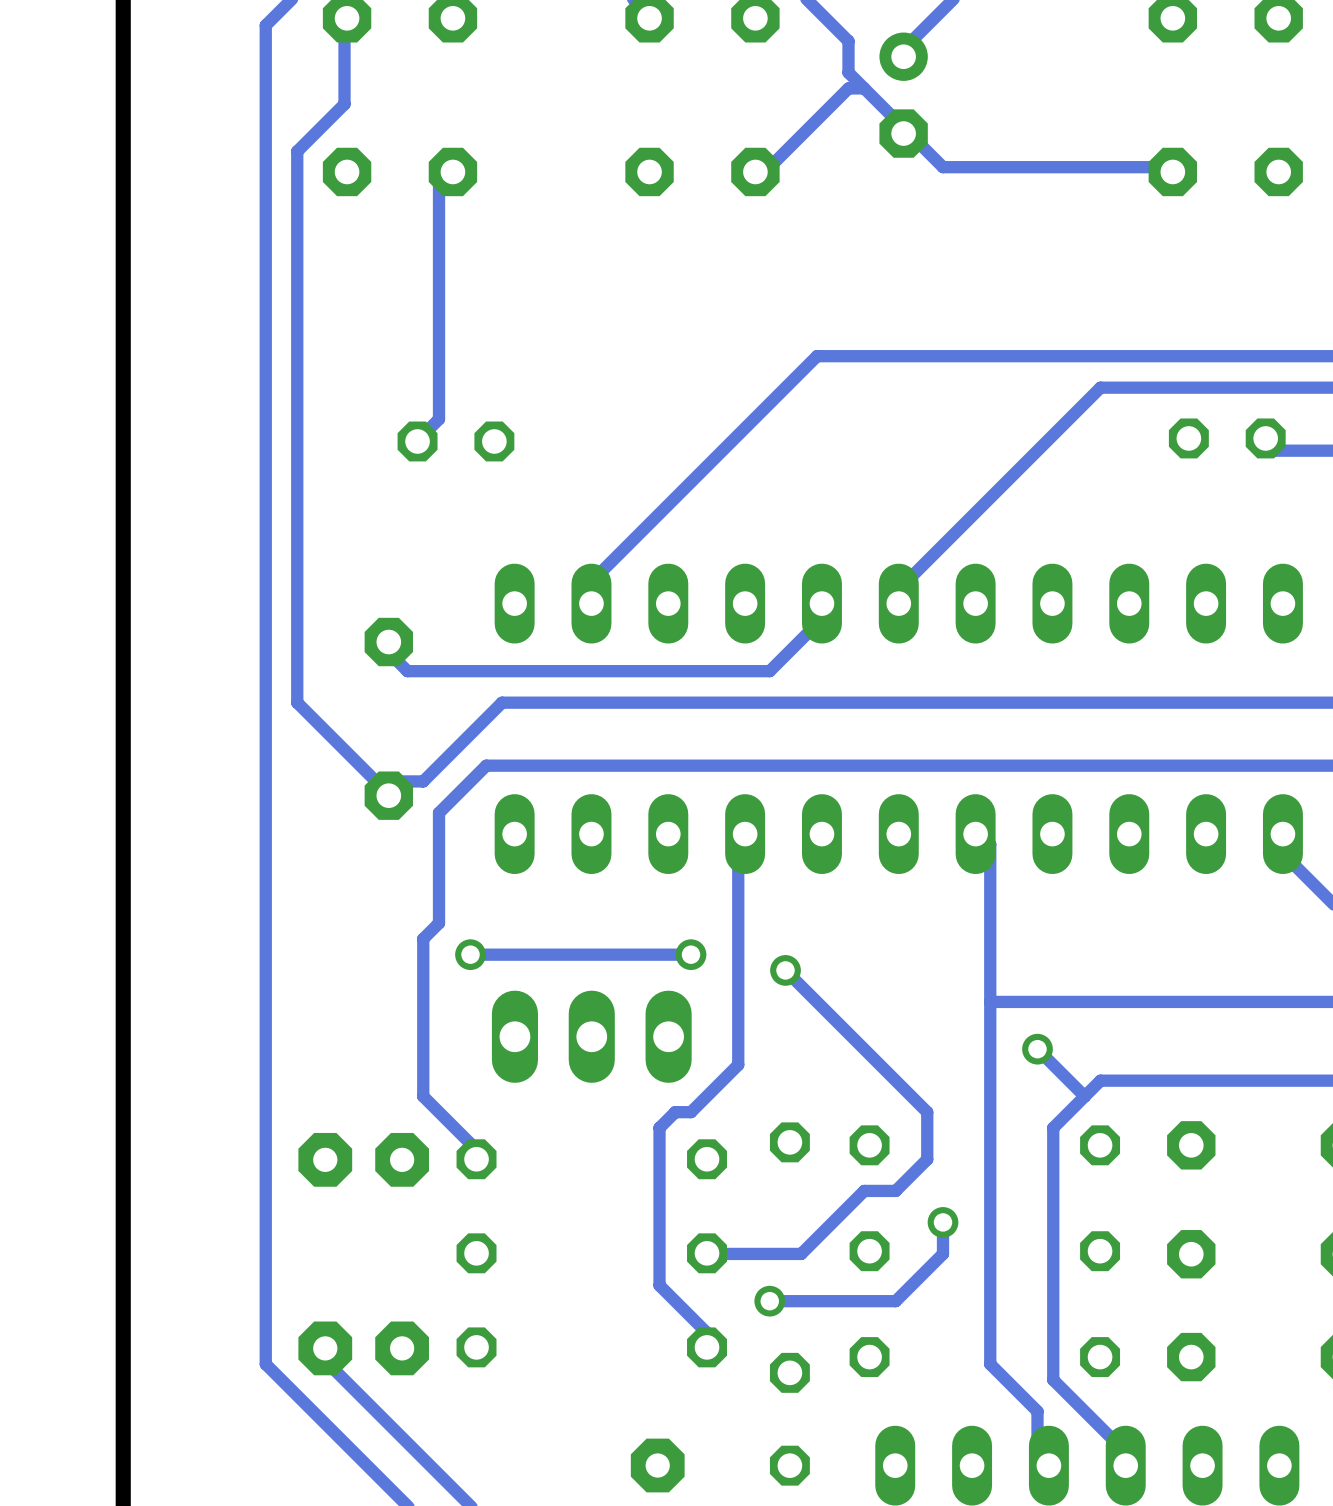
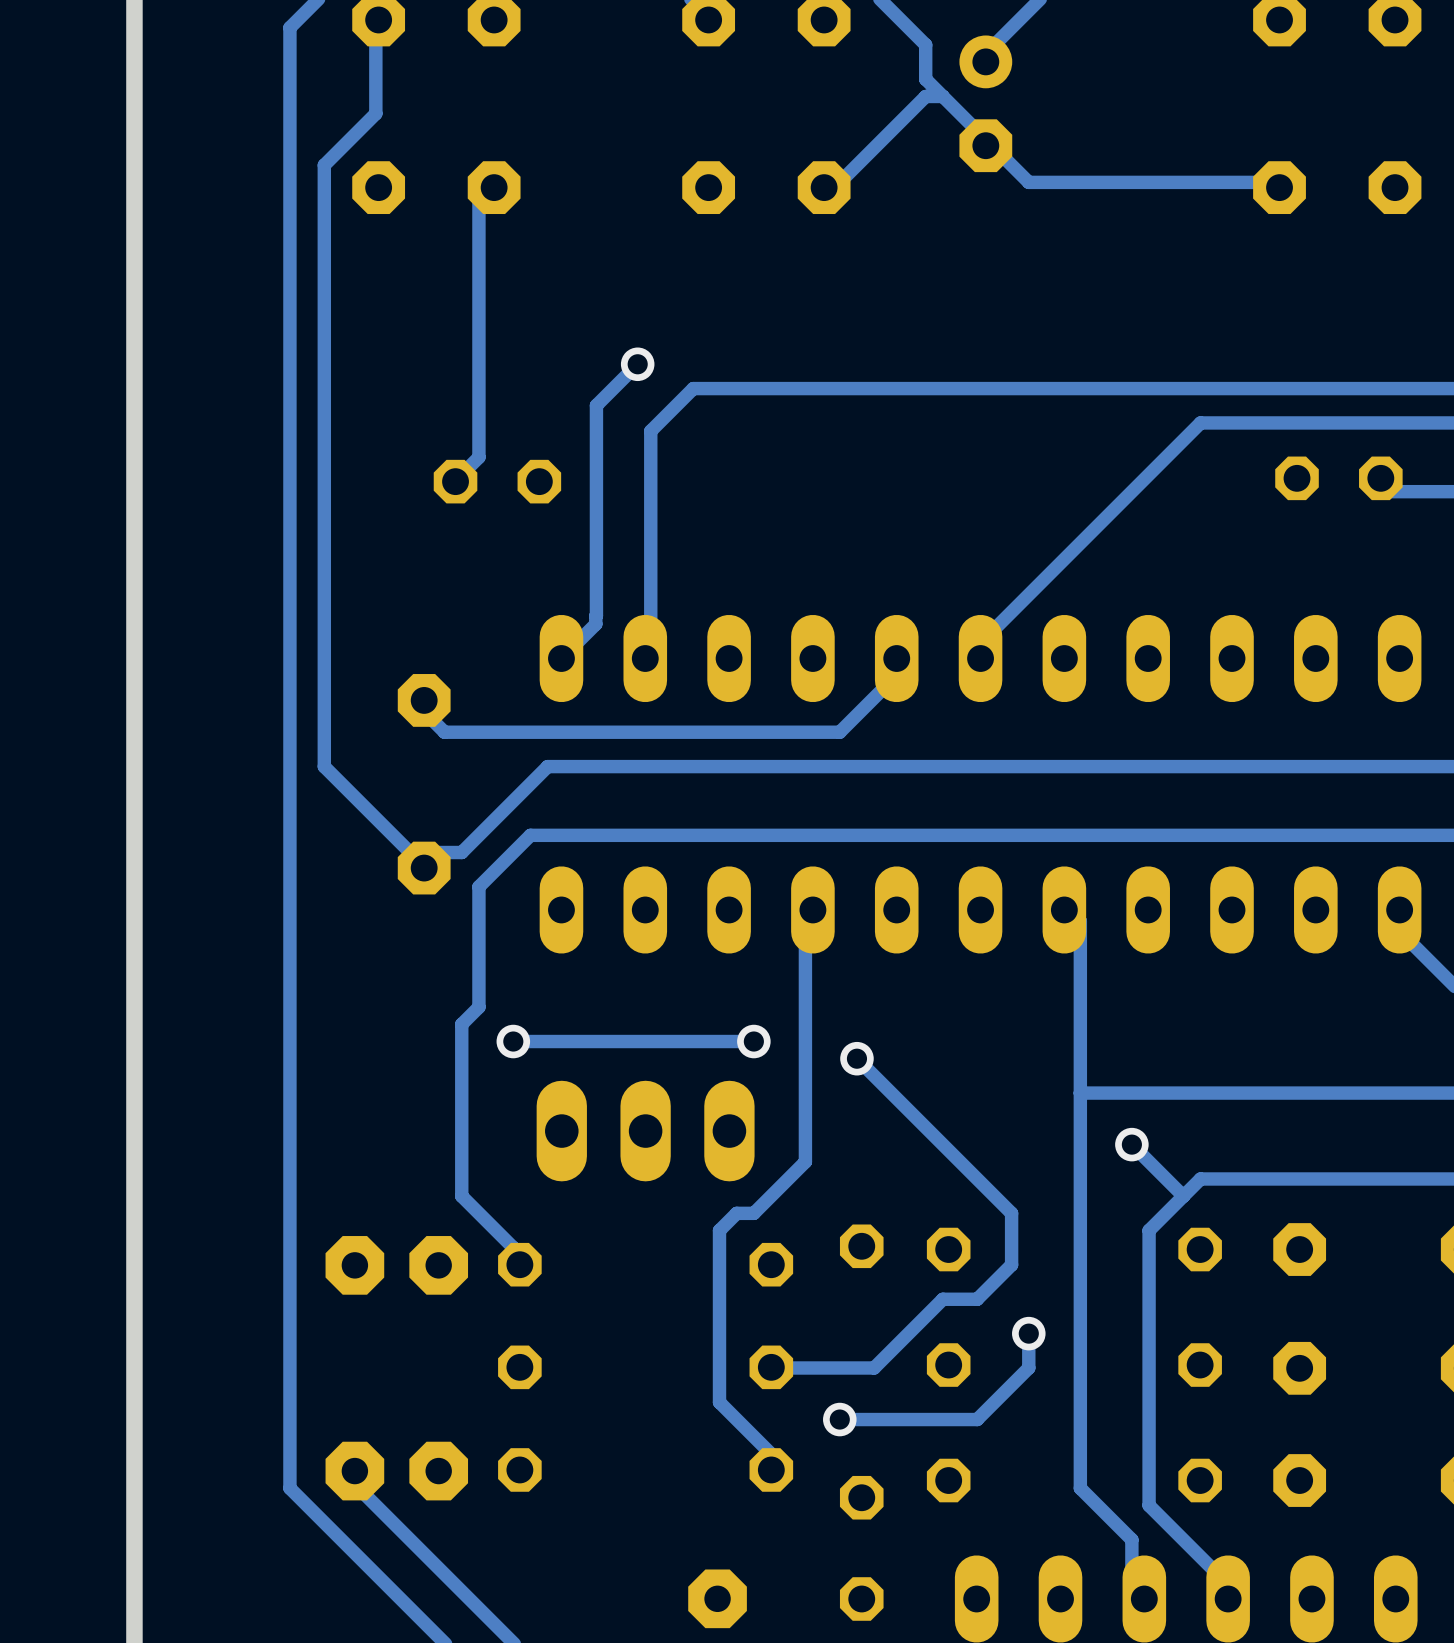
track: none -> (637, 364) (596, 405) (595, 624) (561, 658)
via: none -> (637, 364)
track: (817, 356) (596, 576) -> (891, 388) (693, 388) (650, 431) (650, 629)

